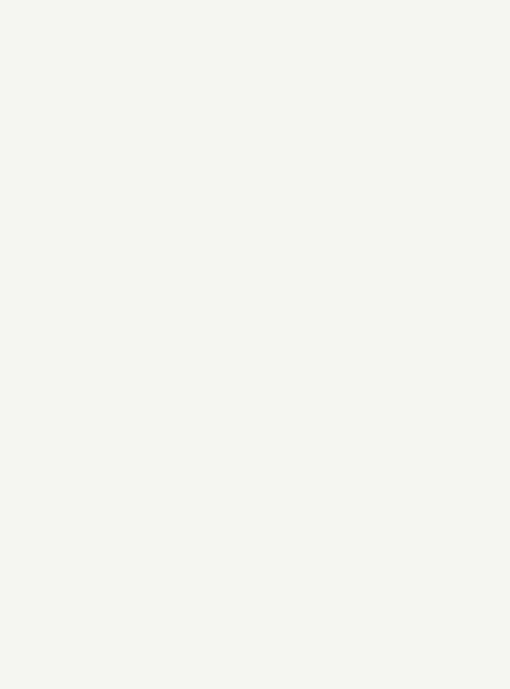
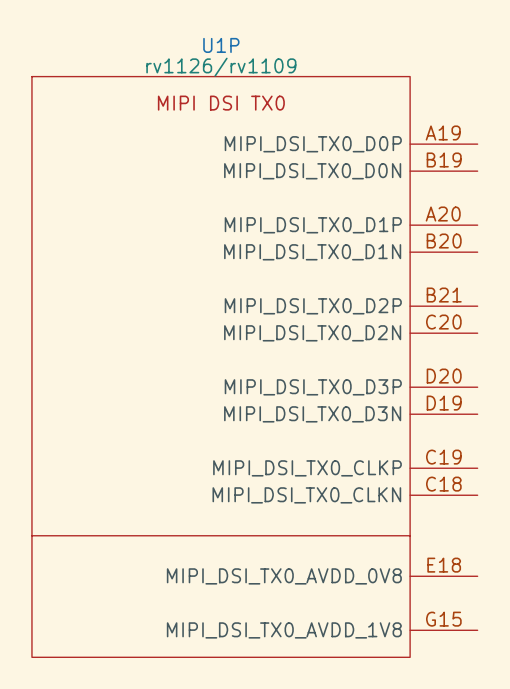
U1P: none -> rv1126/rv1109 (254, 366)

